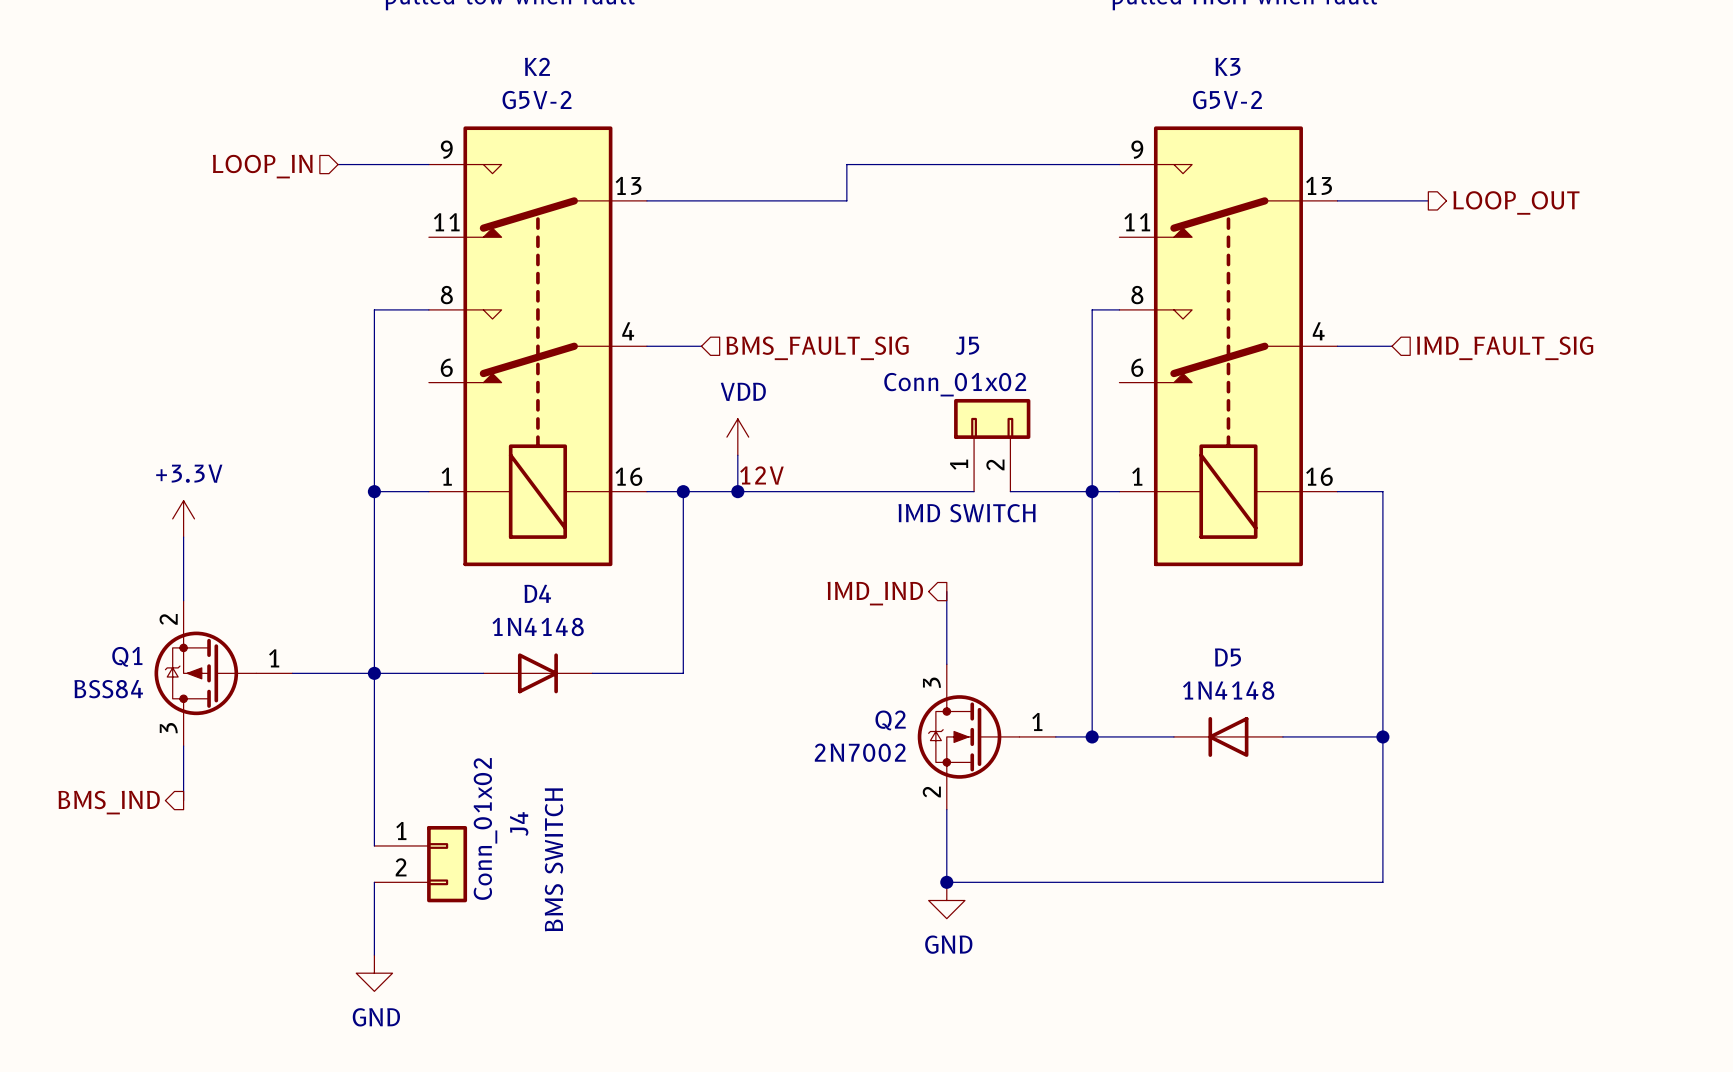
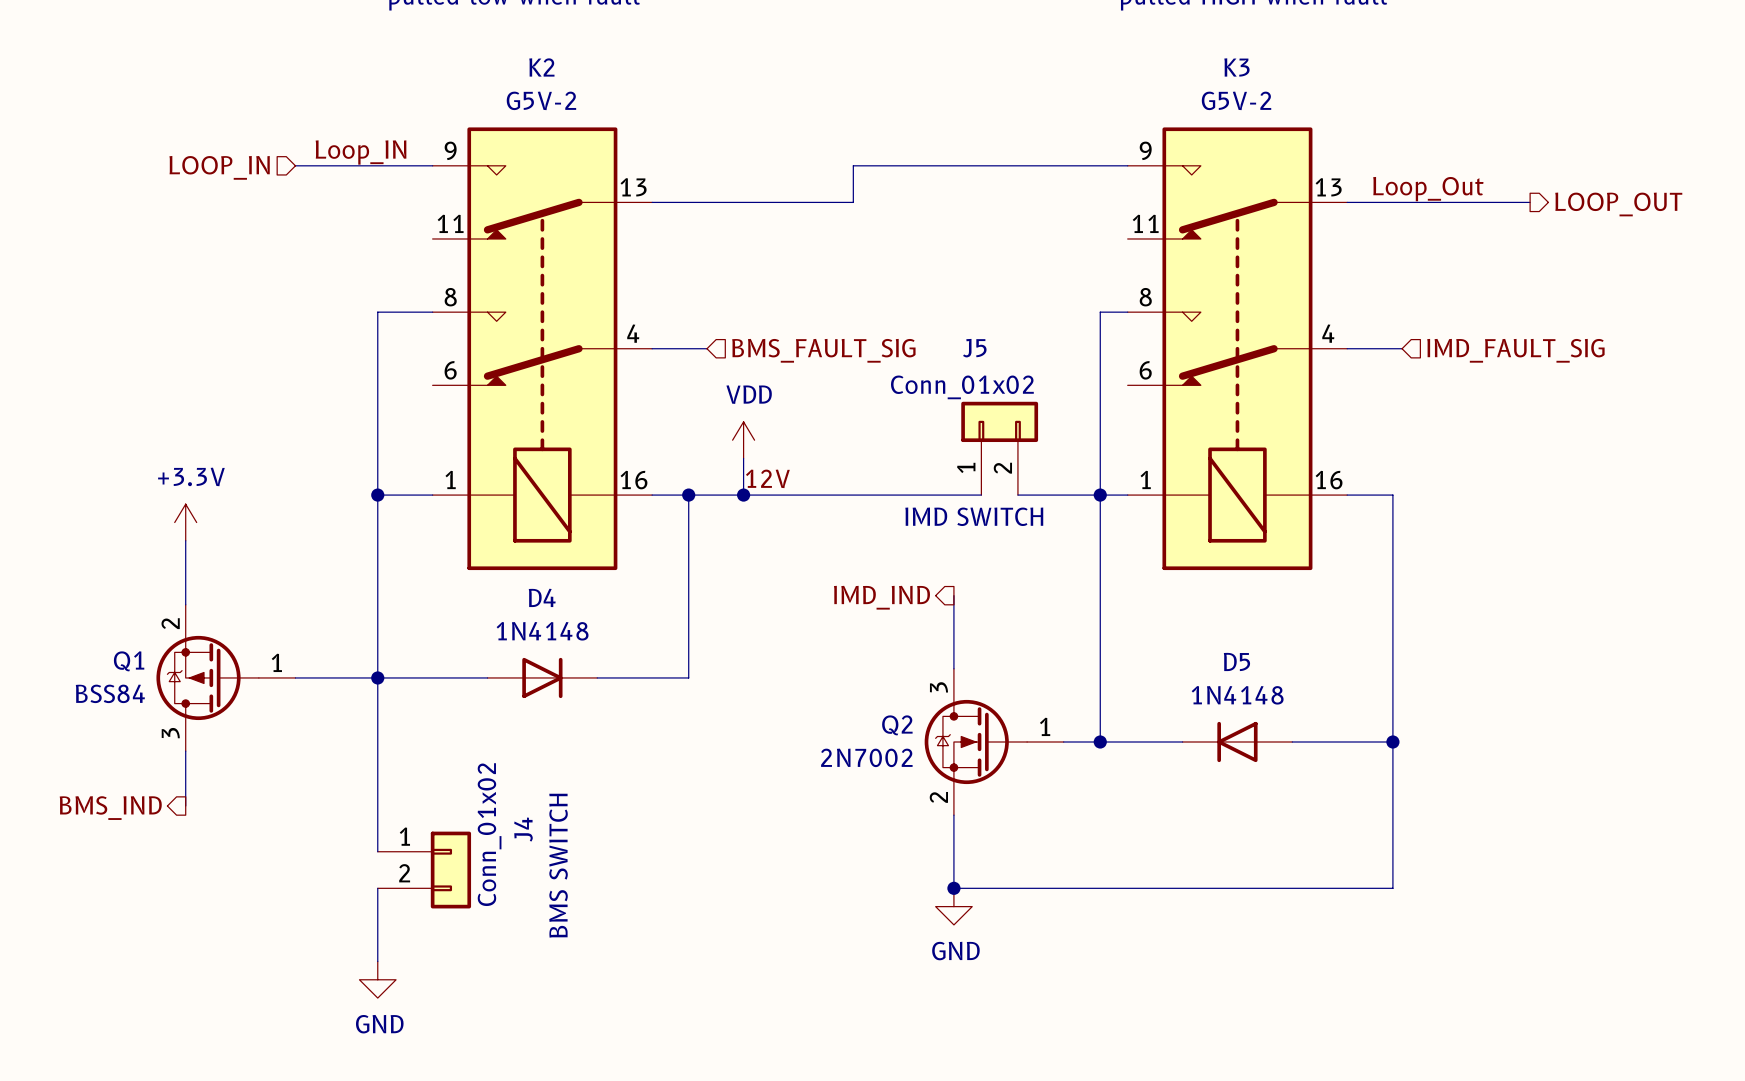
label: none -> Loop_IN (361, 152)
wire: none -> (295, 165) (341, 165)
hierarchical label position: LOOP_IN (262, 166) -> LOOP_IN (219, 167)
label: none -> Loop_Out (1428, 189)
wire: none -> (1438, 202) (1530, 202)
hierarchical label position: LOOP_OUT (1516, 202) -> LOOP_OUT (1618, 204)

